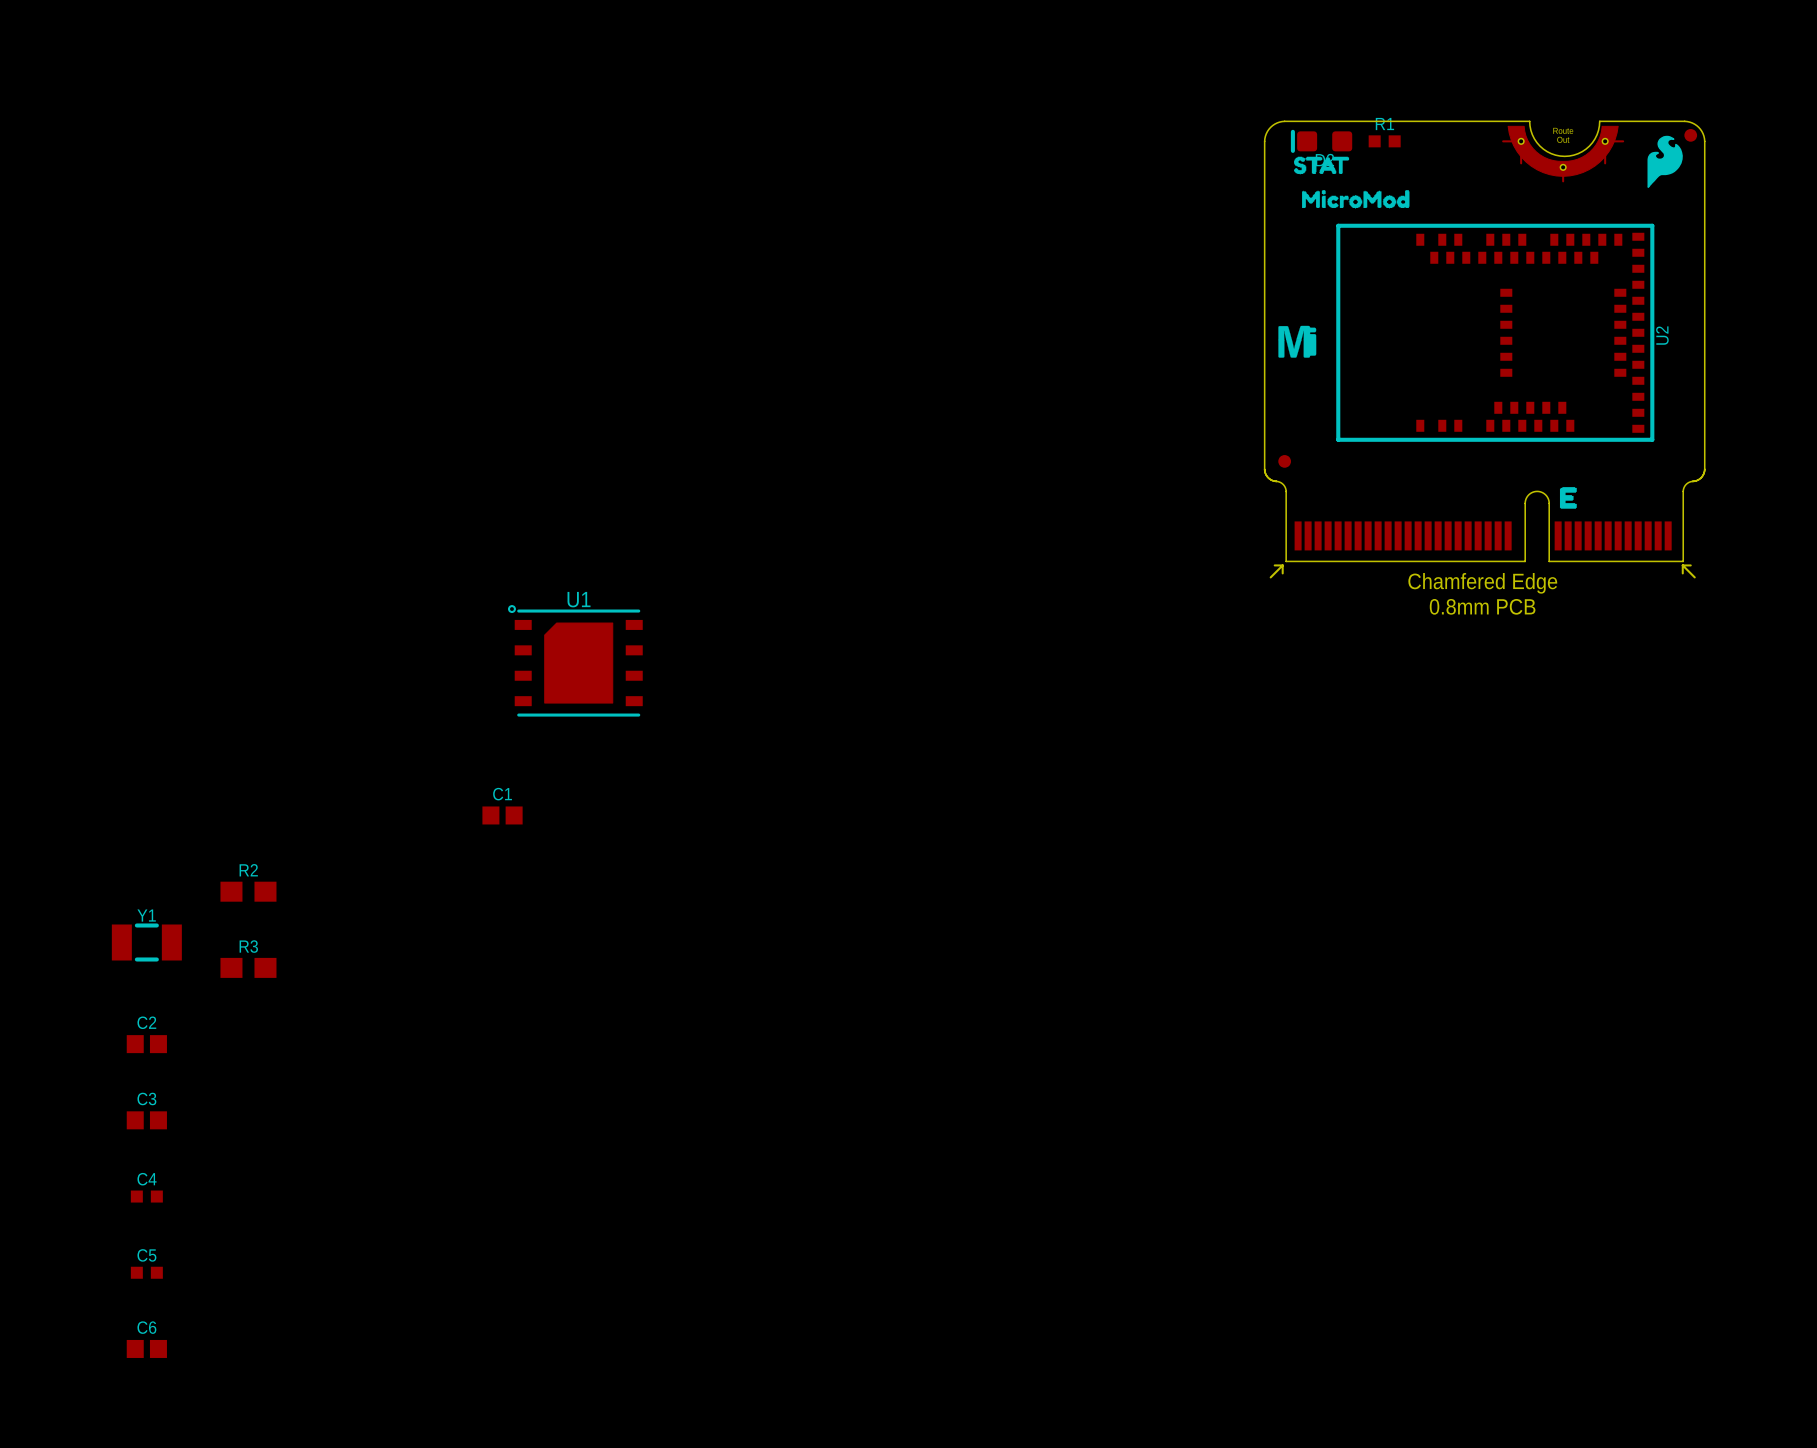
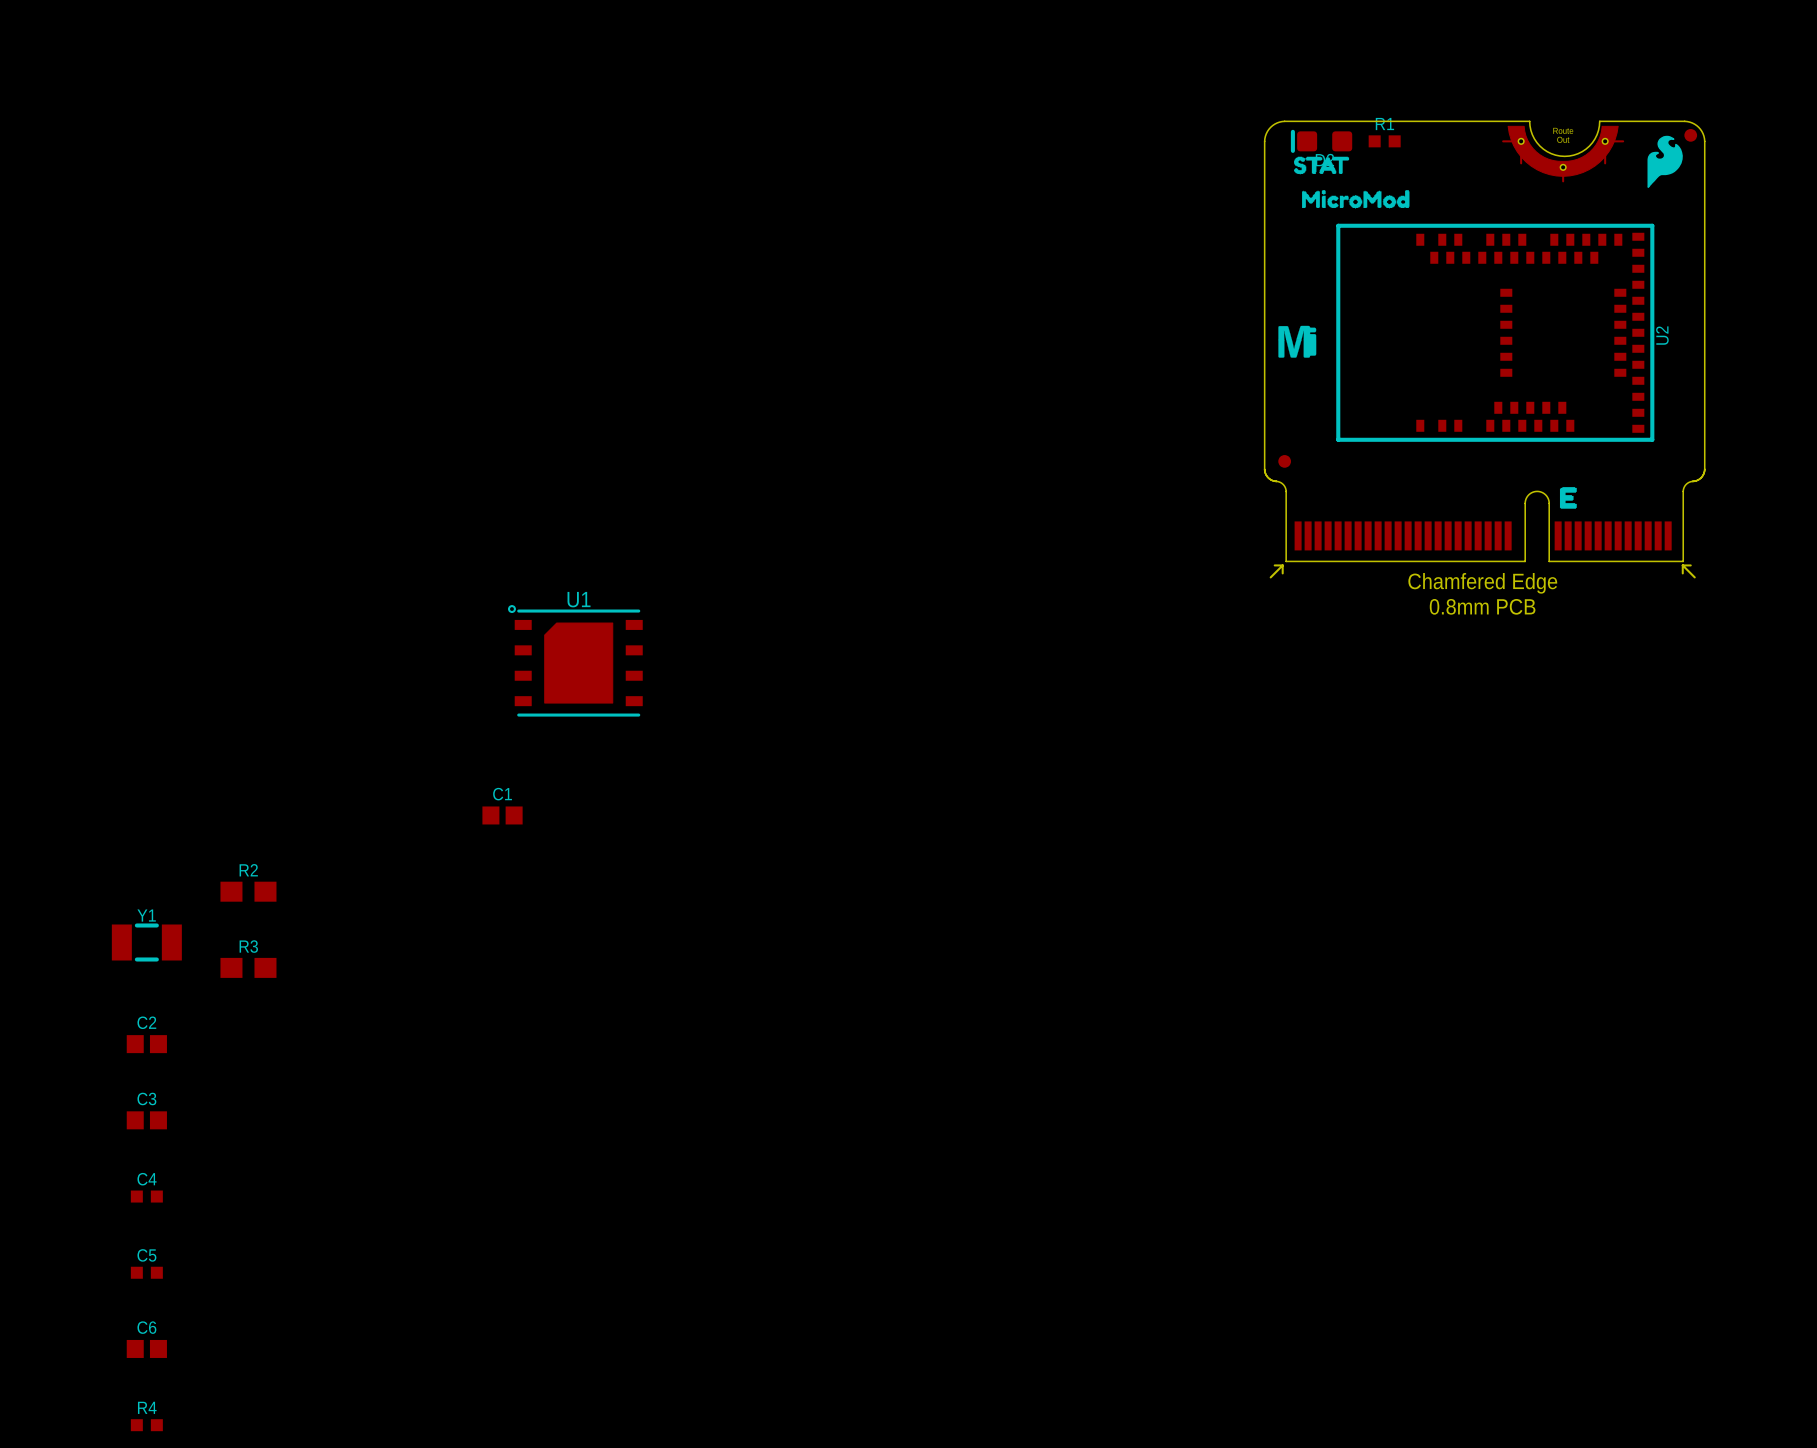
R4: none -> (146, 1425)

